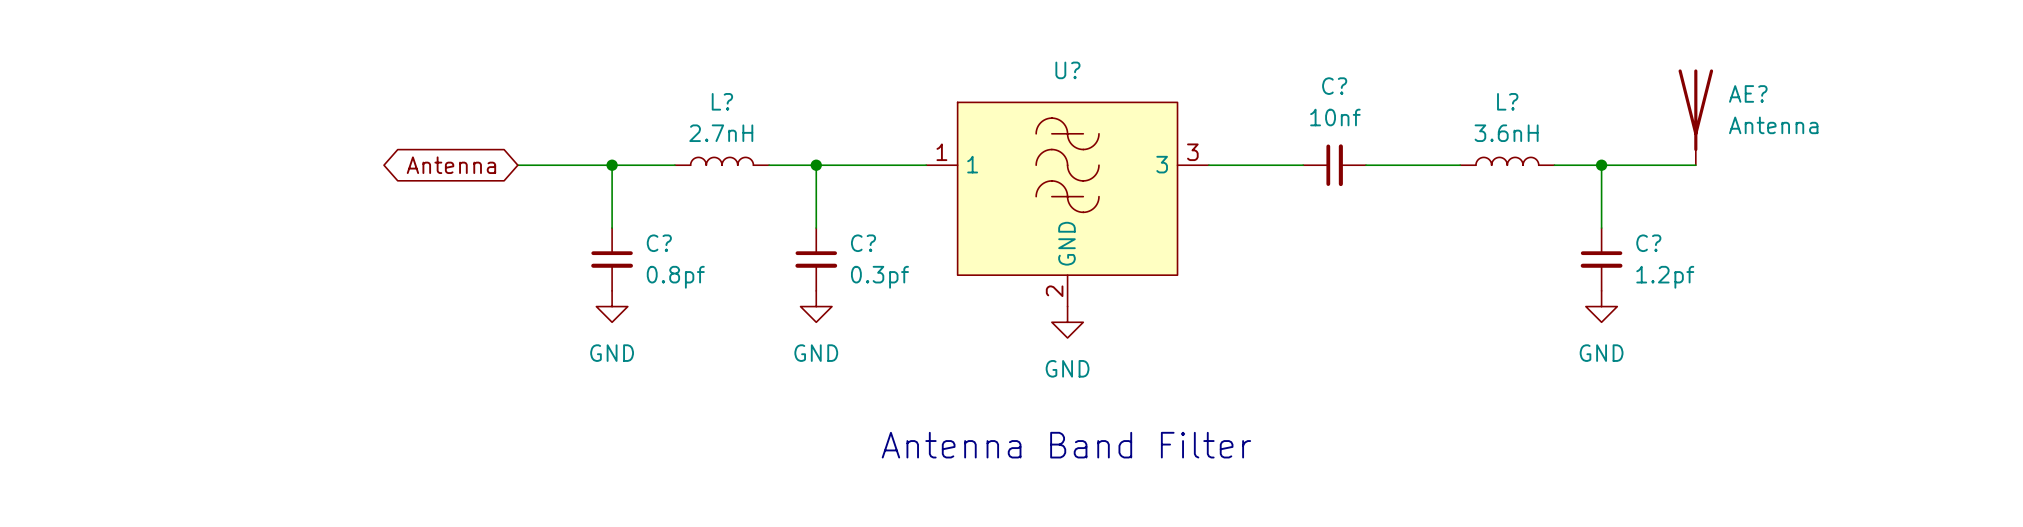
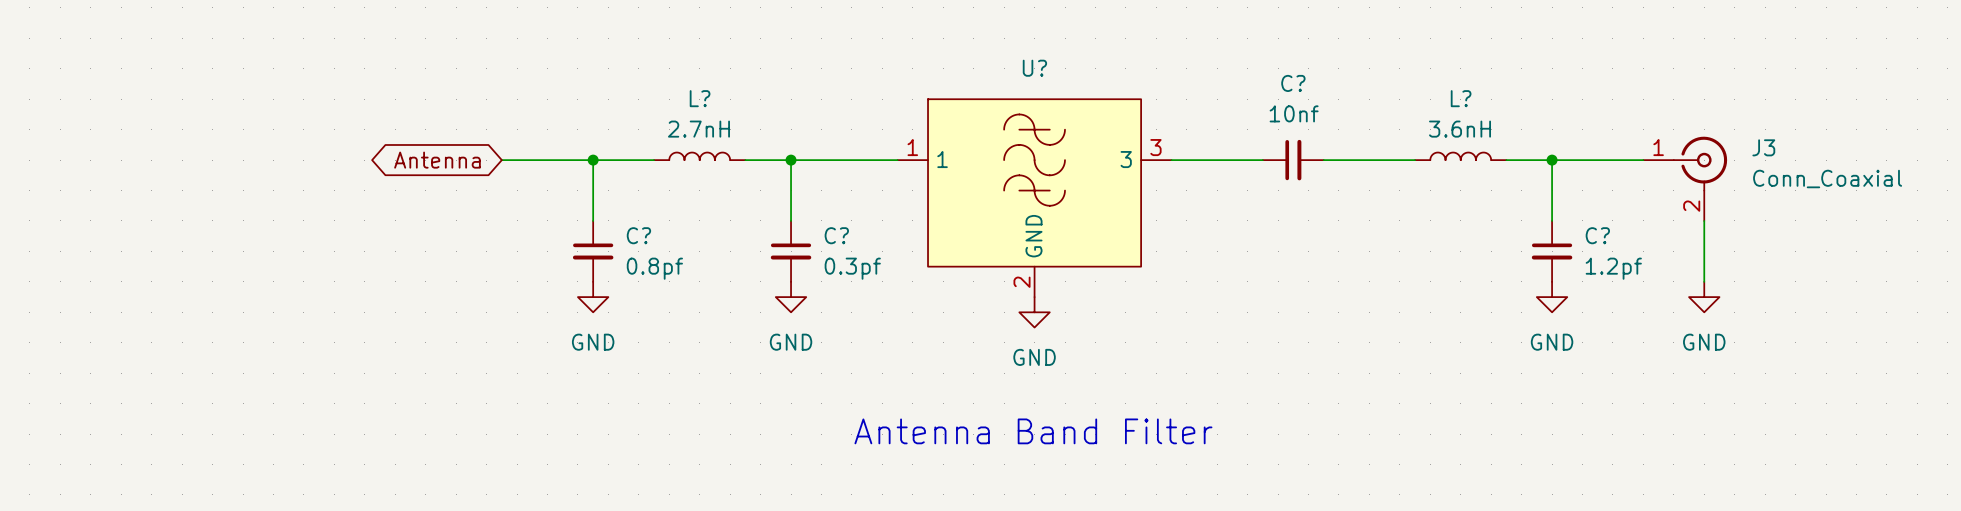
AE?: Antenna (1695, 117) -> none
J3: none -> Conn_Coaxial (1685, 178)
wire: none -> (1704, 220) (1704, 281)
power symbol: none -> GND (1704, 297)

